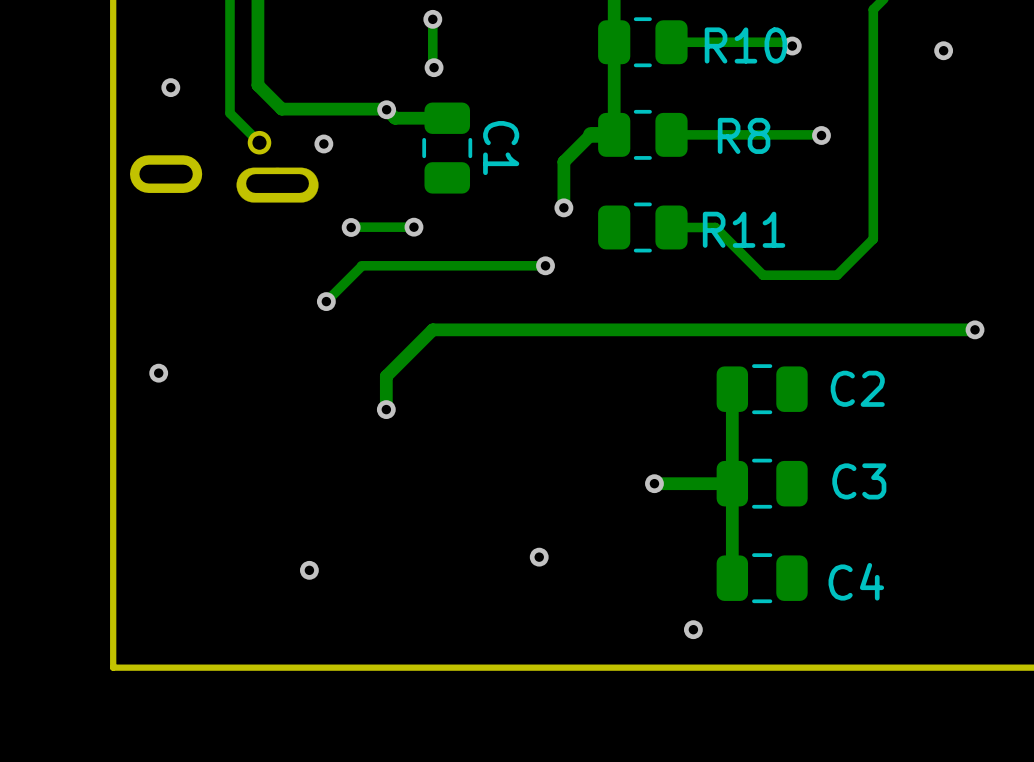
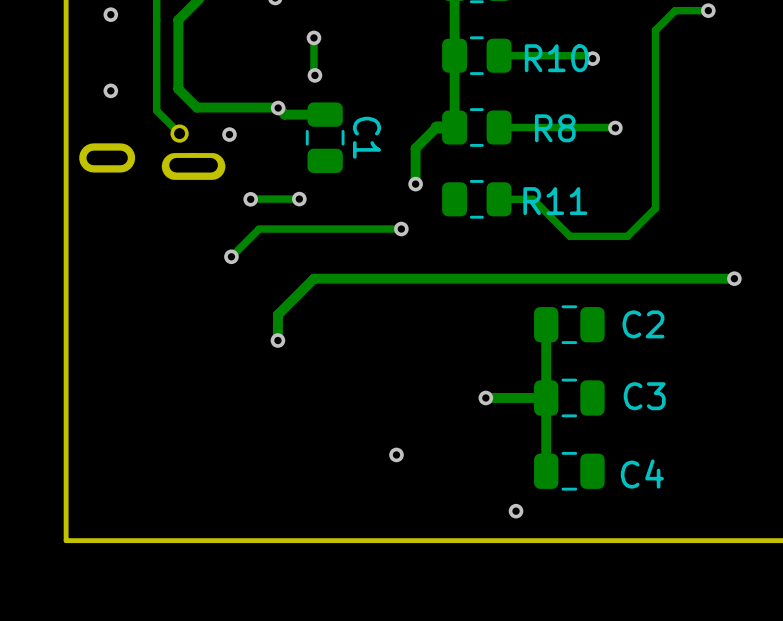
via: (943, 50) -> none
via: (158, 373) -> none
via: (309, 570) -> none

